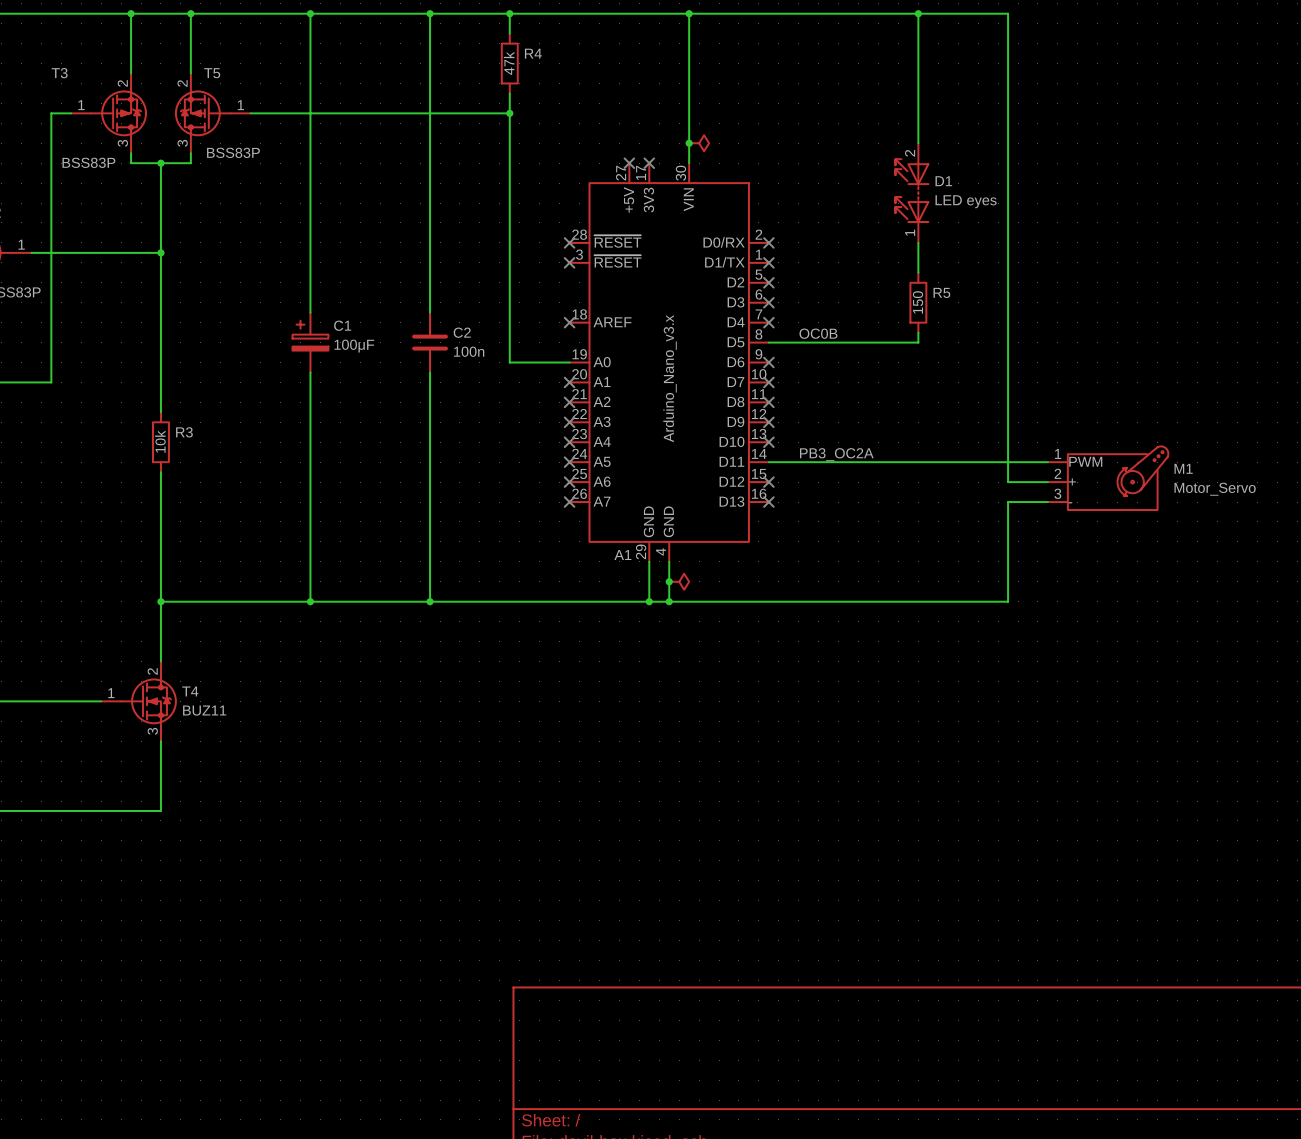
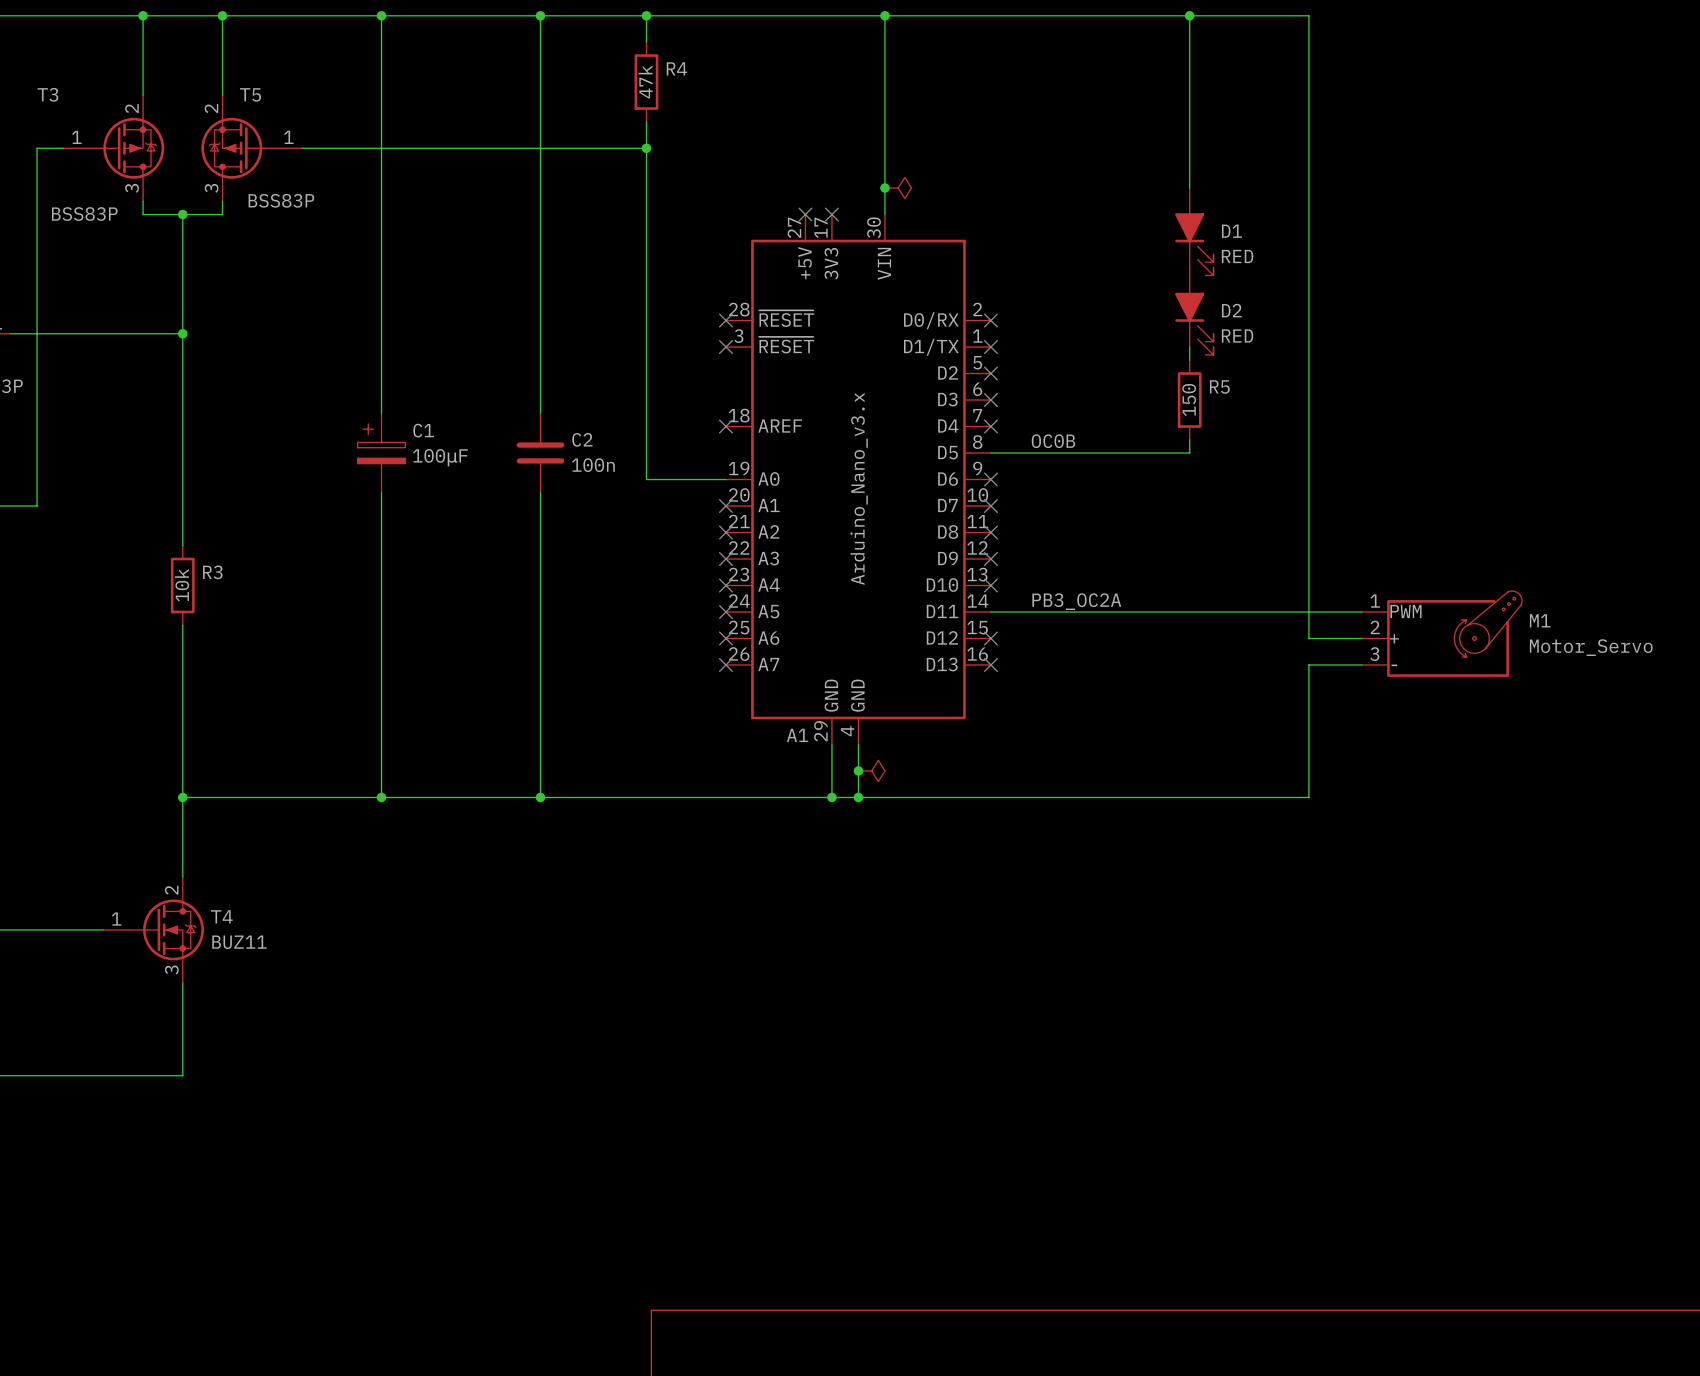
D1 symbol: [895, 143, 930, 243] -> [1175, 188, 1214, 276]
D1 value: LED eyes (966, 201) -> RED (1237, 256)
D2: none -> RED (1194, 311)

